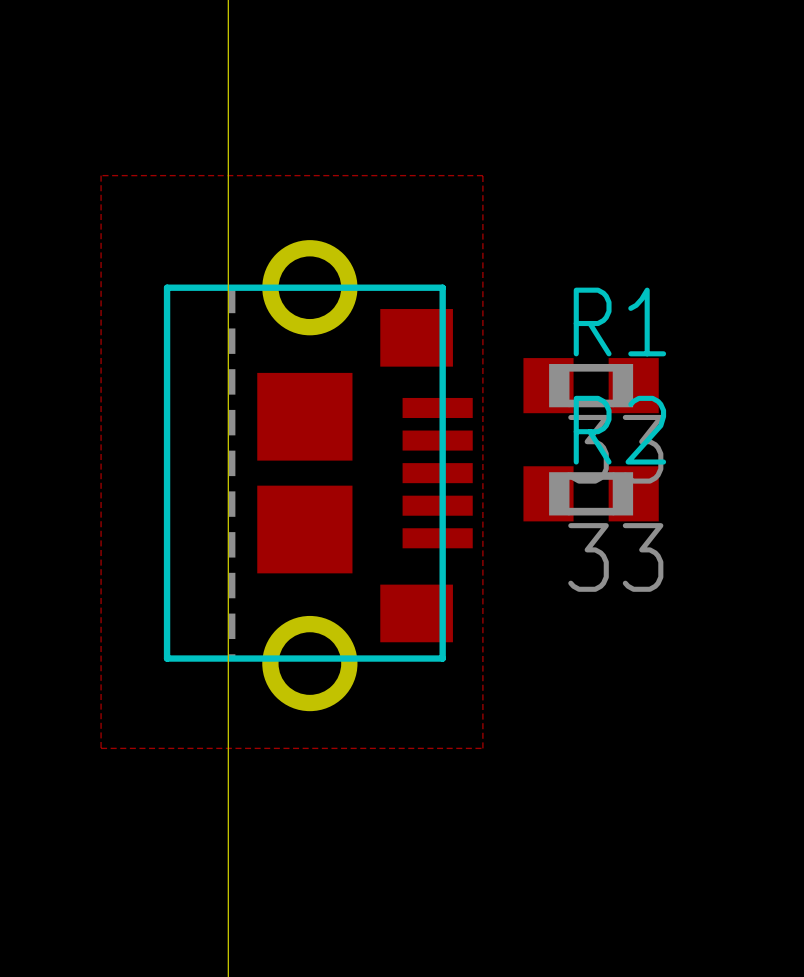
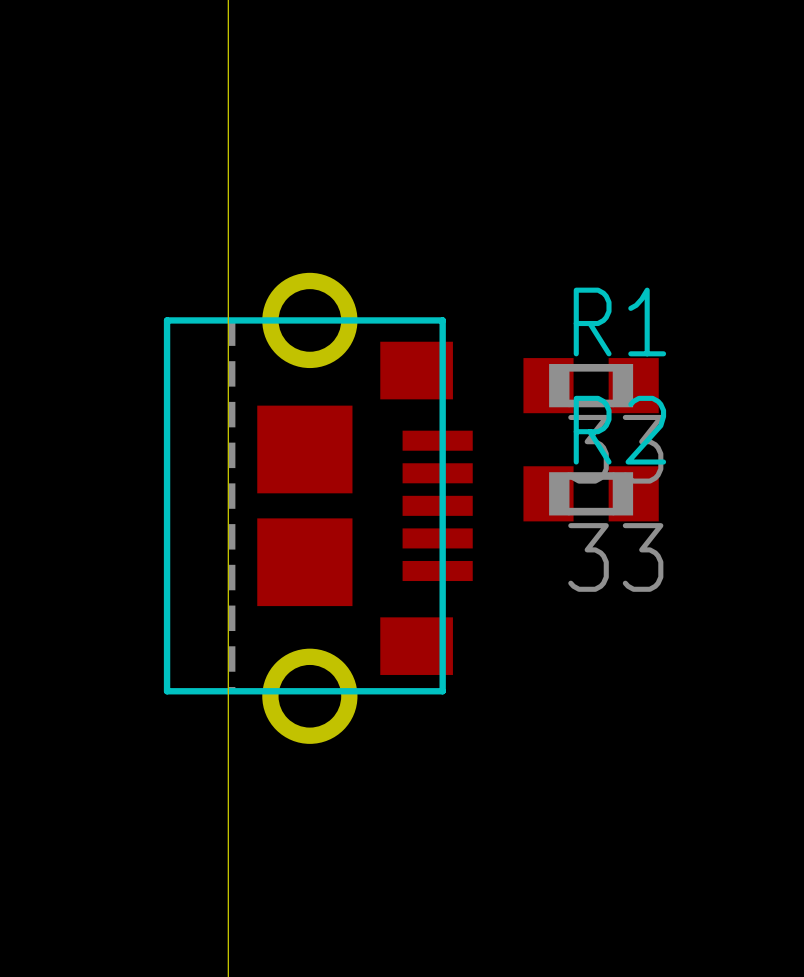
zone outline: (101, 175) (101, 748) (482, 748) (482, 175) (101, 175) -> none
part position: (318, 475) -> (318, 508)

